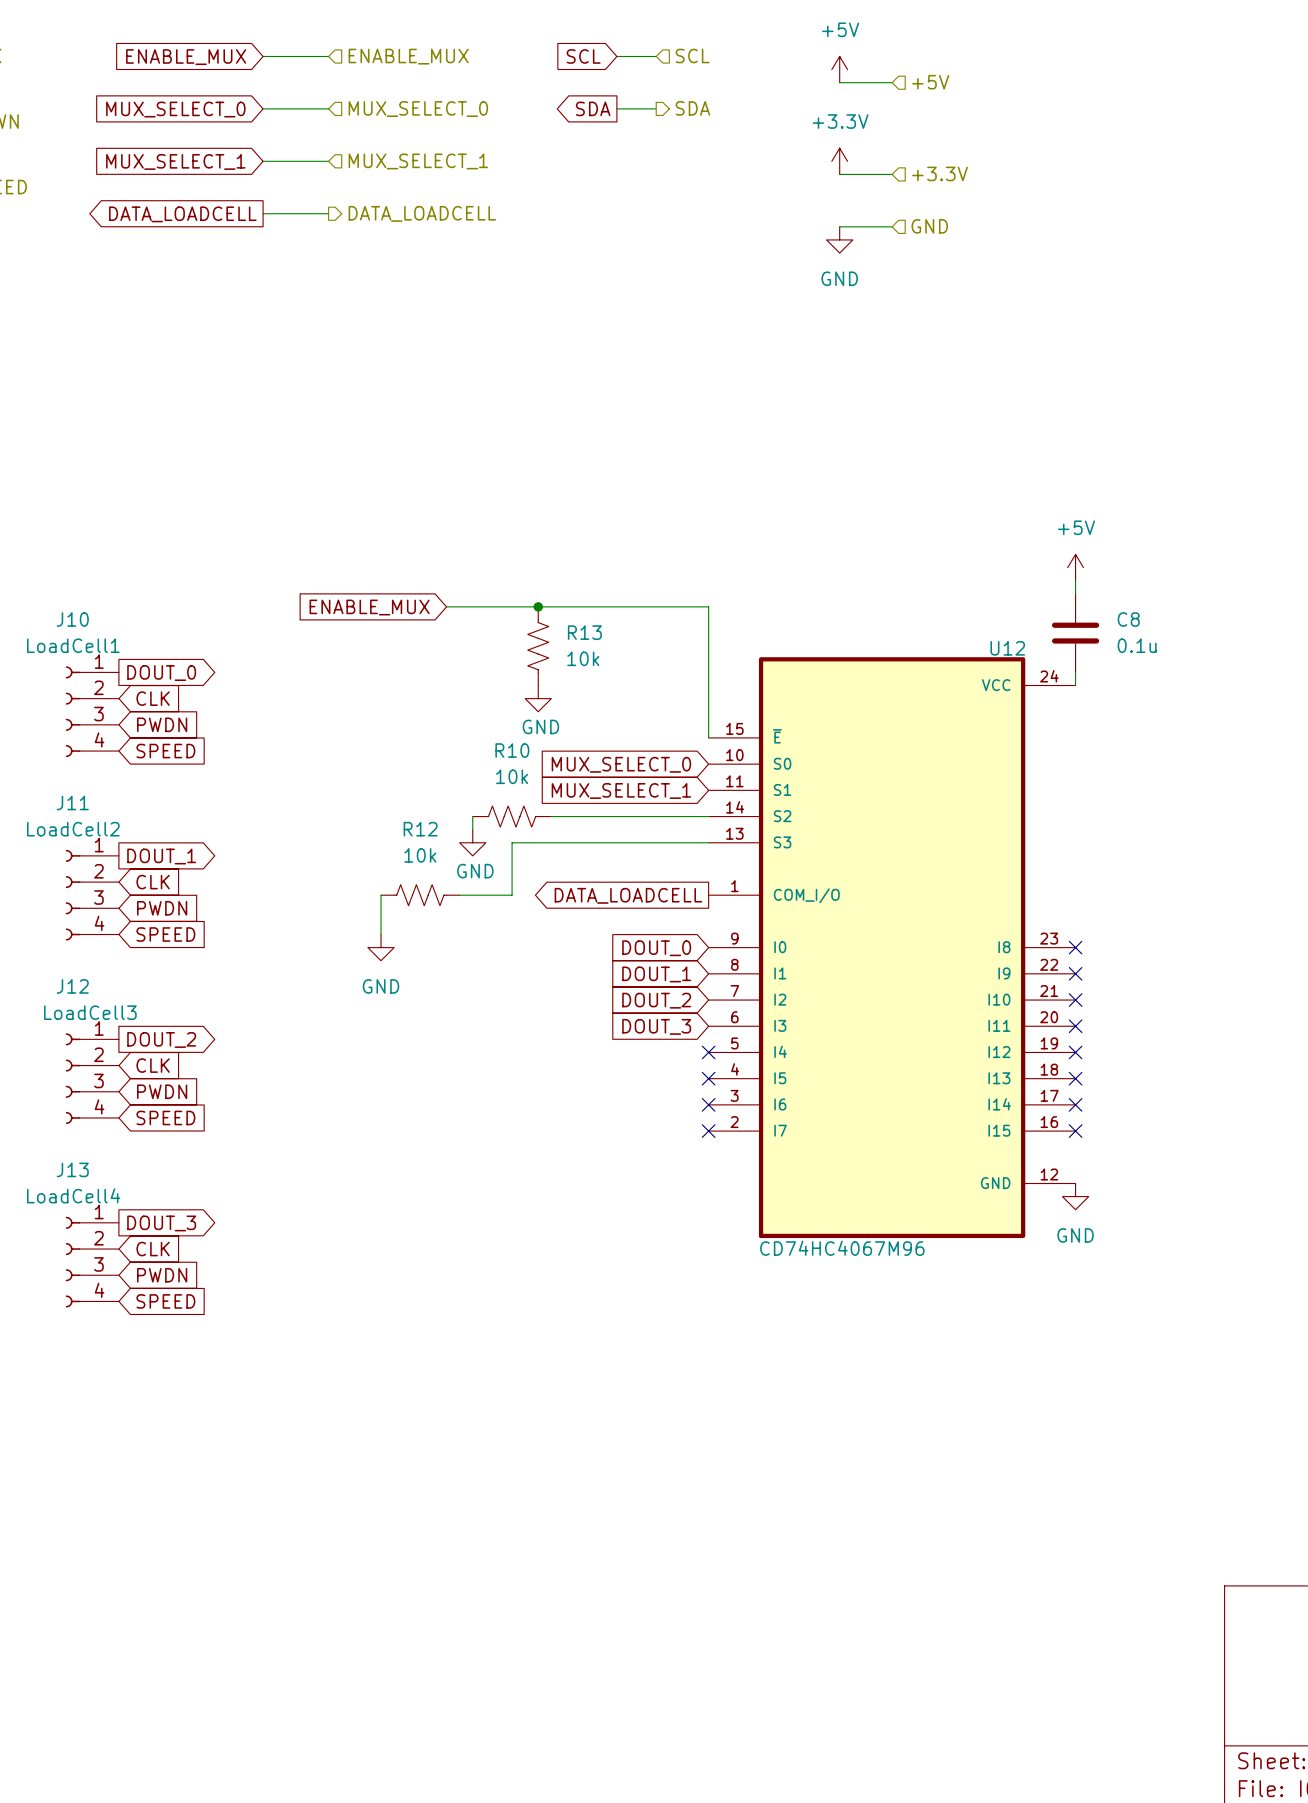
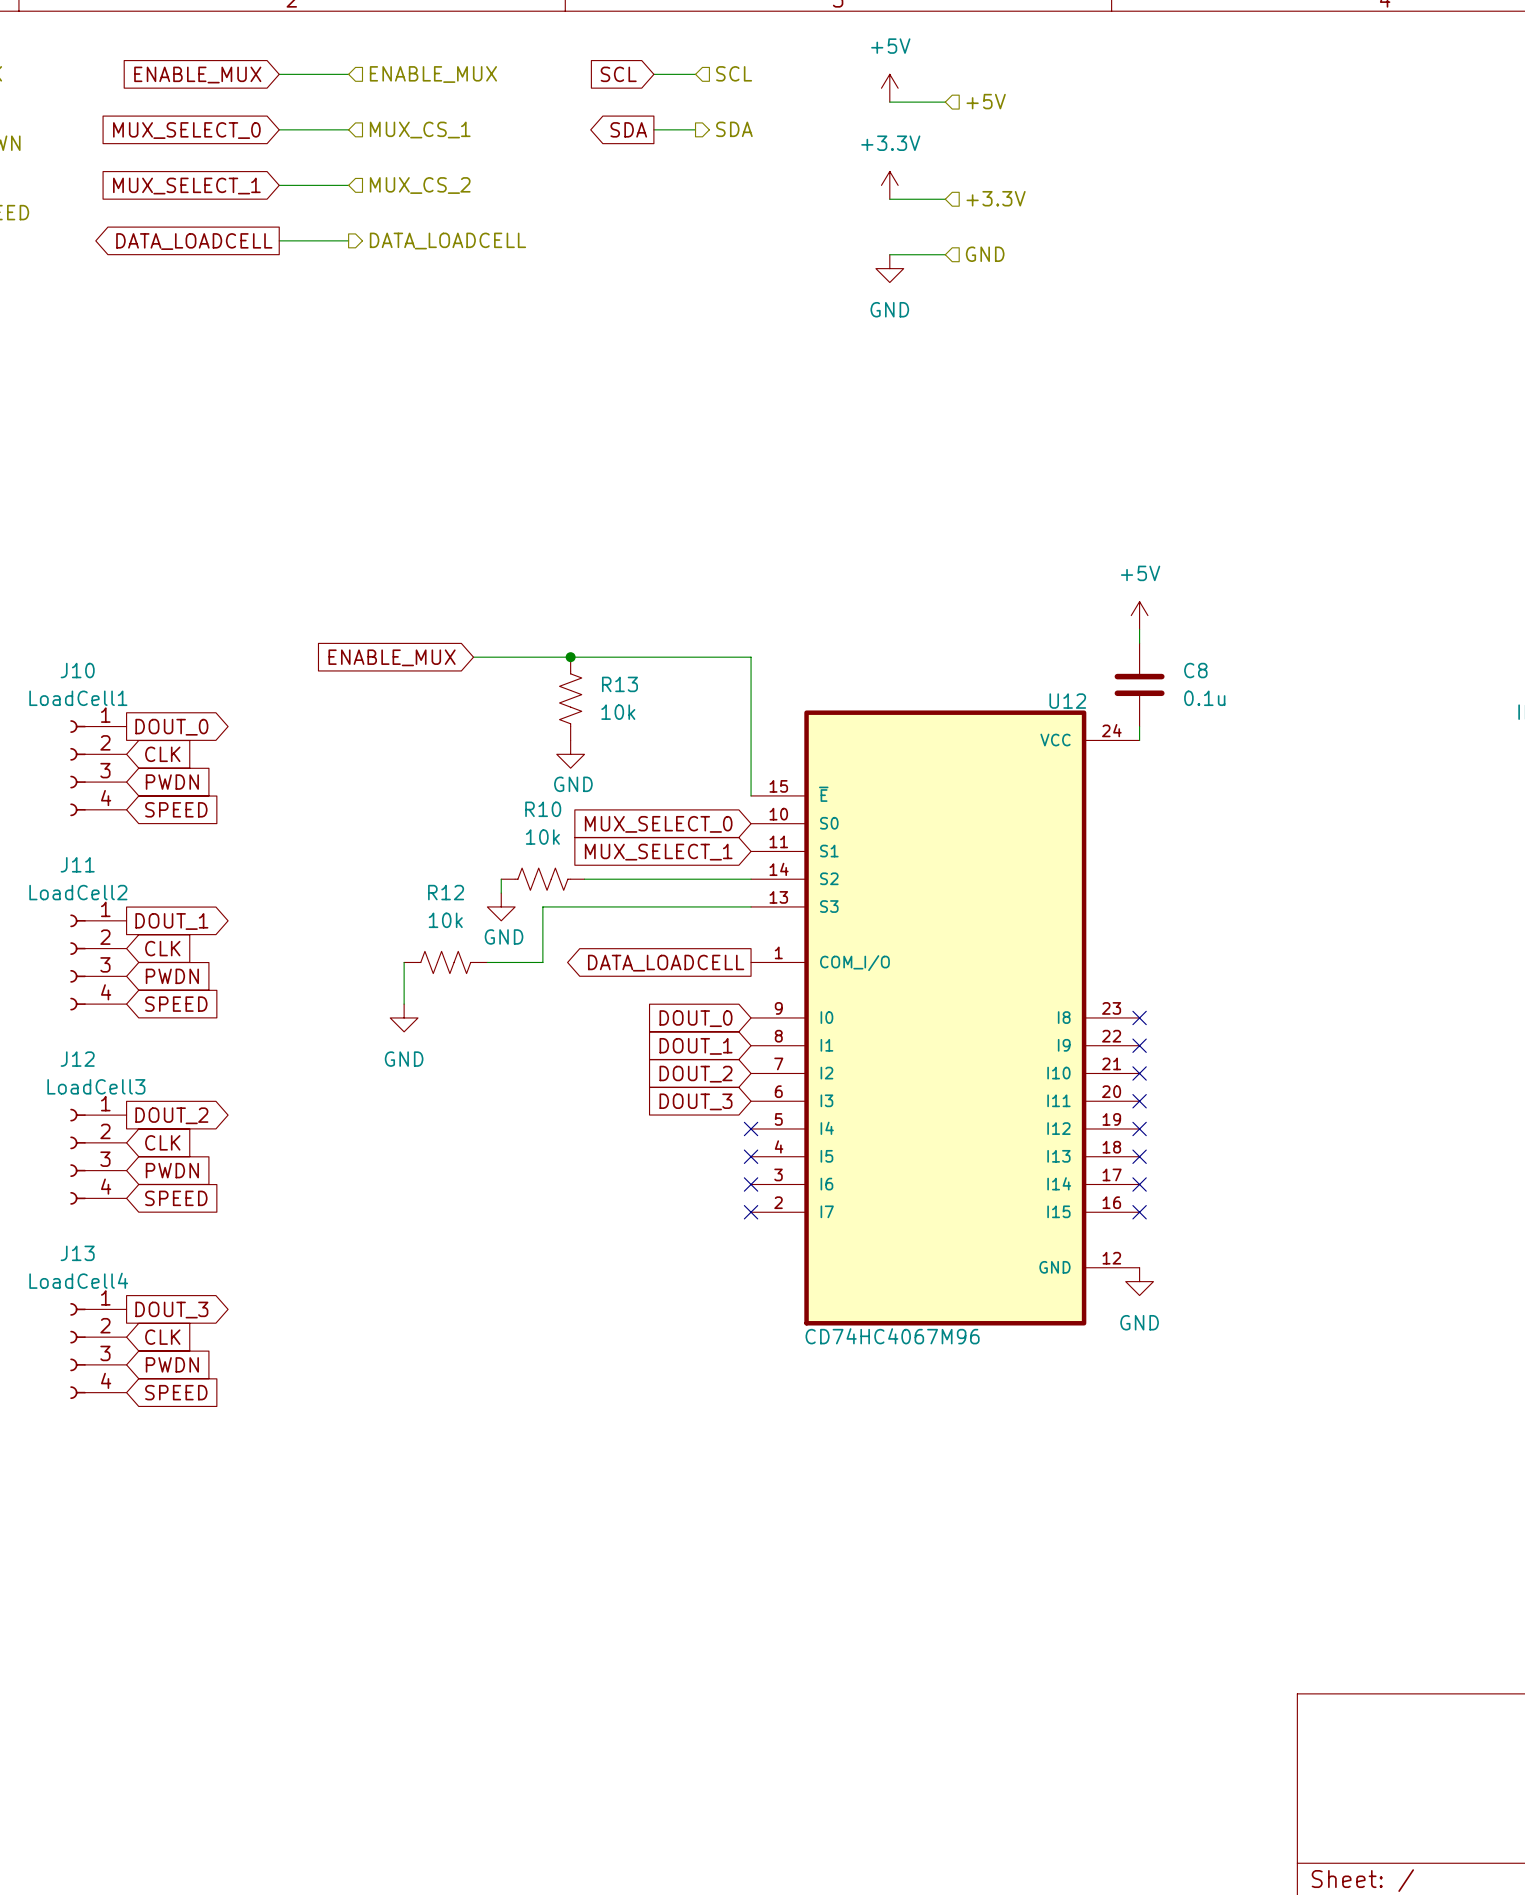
hierarchical label: MUX_SELECT_0 (418, 109) -> MUX_CS_1 (420, 130)
hierarchical label: MUX_SELECT_1 (418, 161) -> MUX_CS_2 (420, 185)

